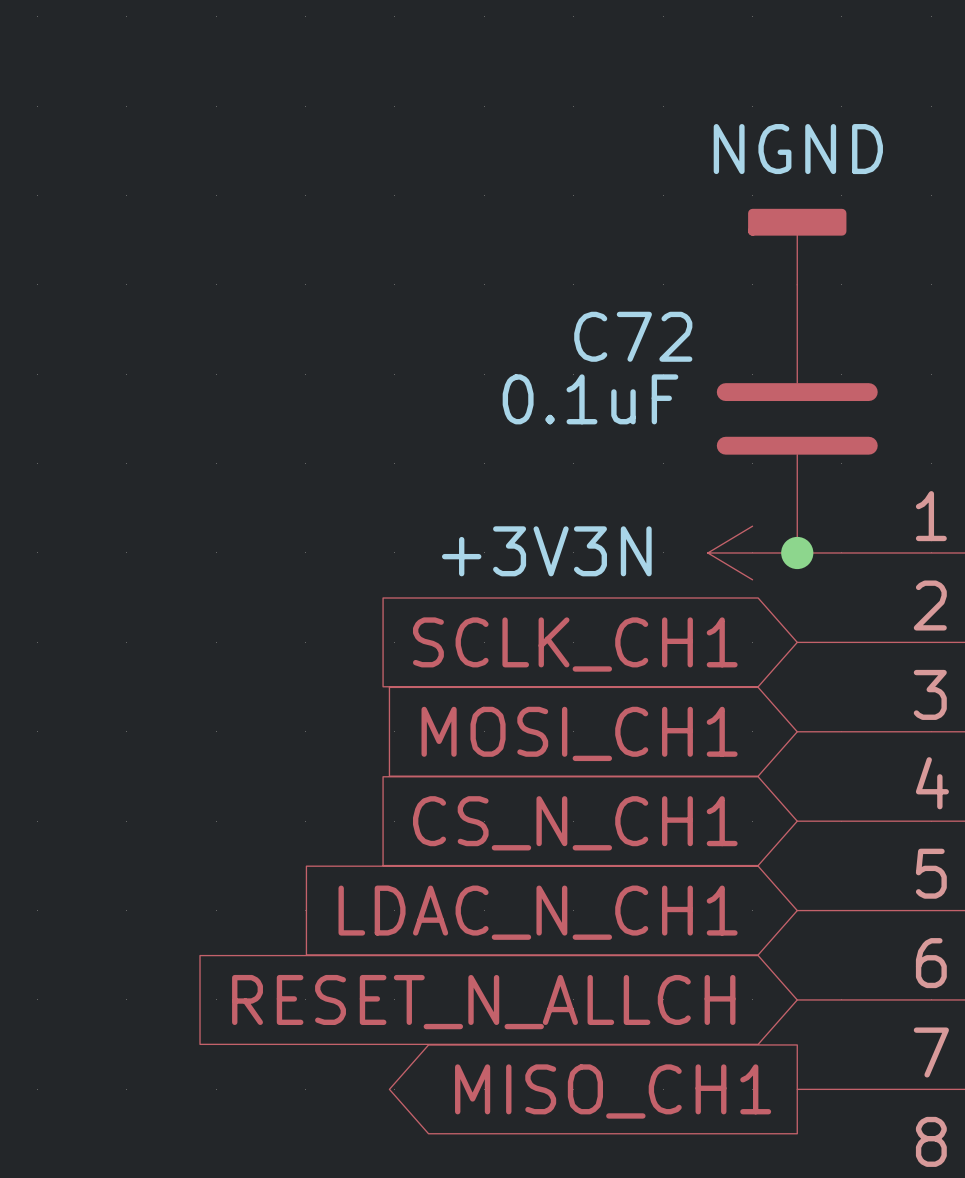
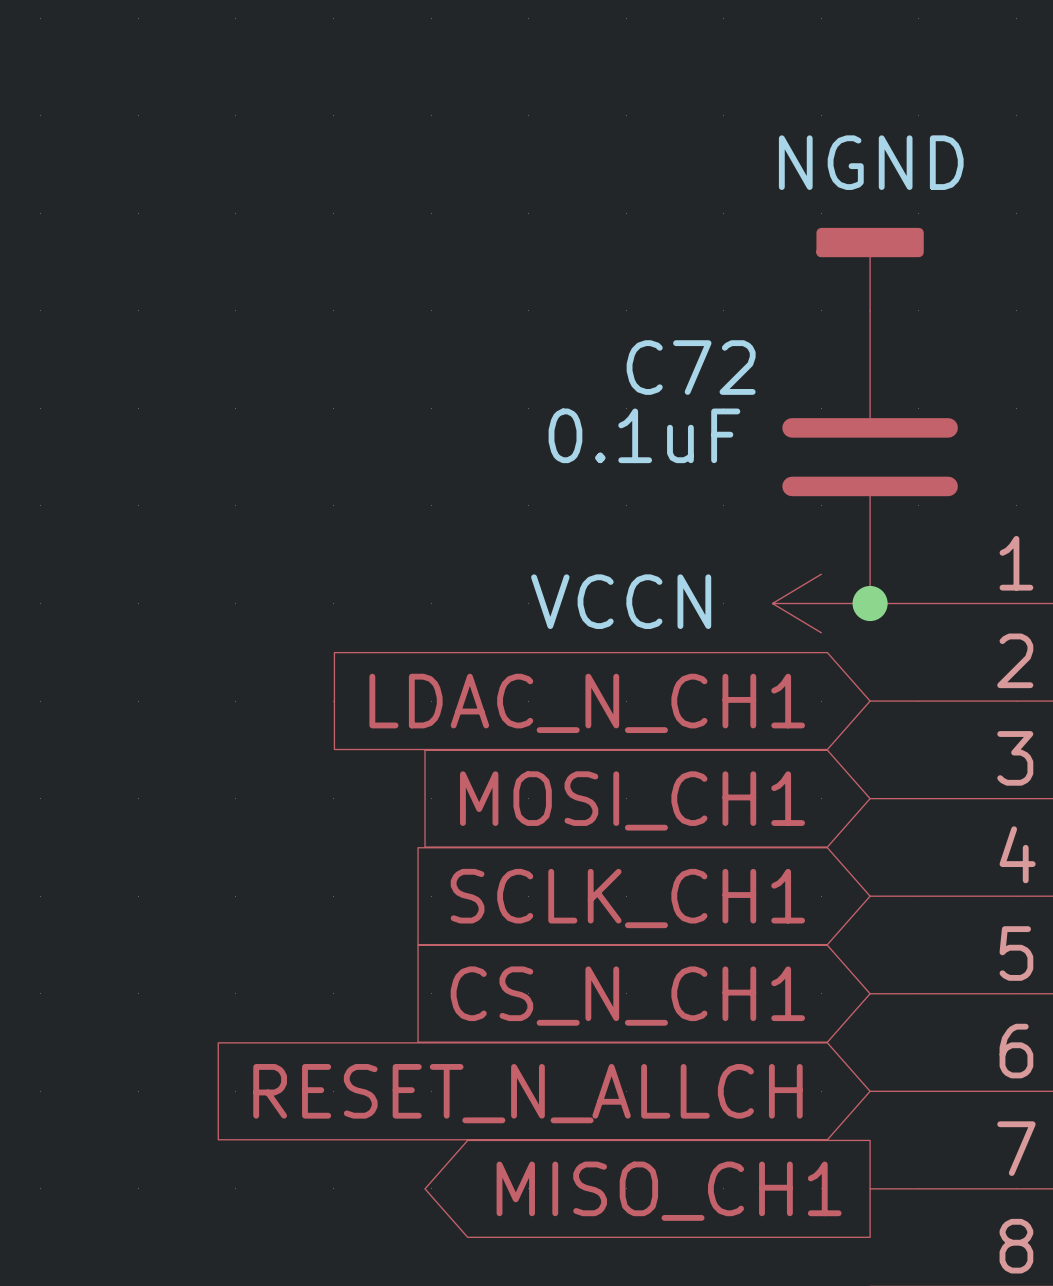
power symbol: +3V3N (752, 552) -> VCCN (821, 603)
global label: SCLK_CH1 (575, 644) -> LDAC_N_CH1 (587, 703)
global label: CS_N_CH1 (575, 823) -> SCLK_CH1 (627, 898)
global label: LDAC_N_CH1 (538, 912) -> CS_N_CH1 (627, 996)

